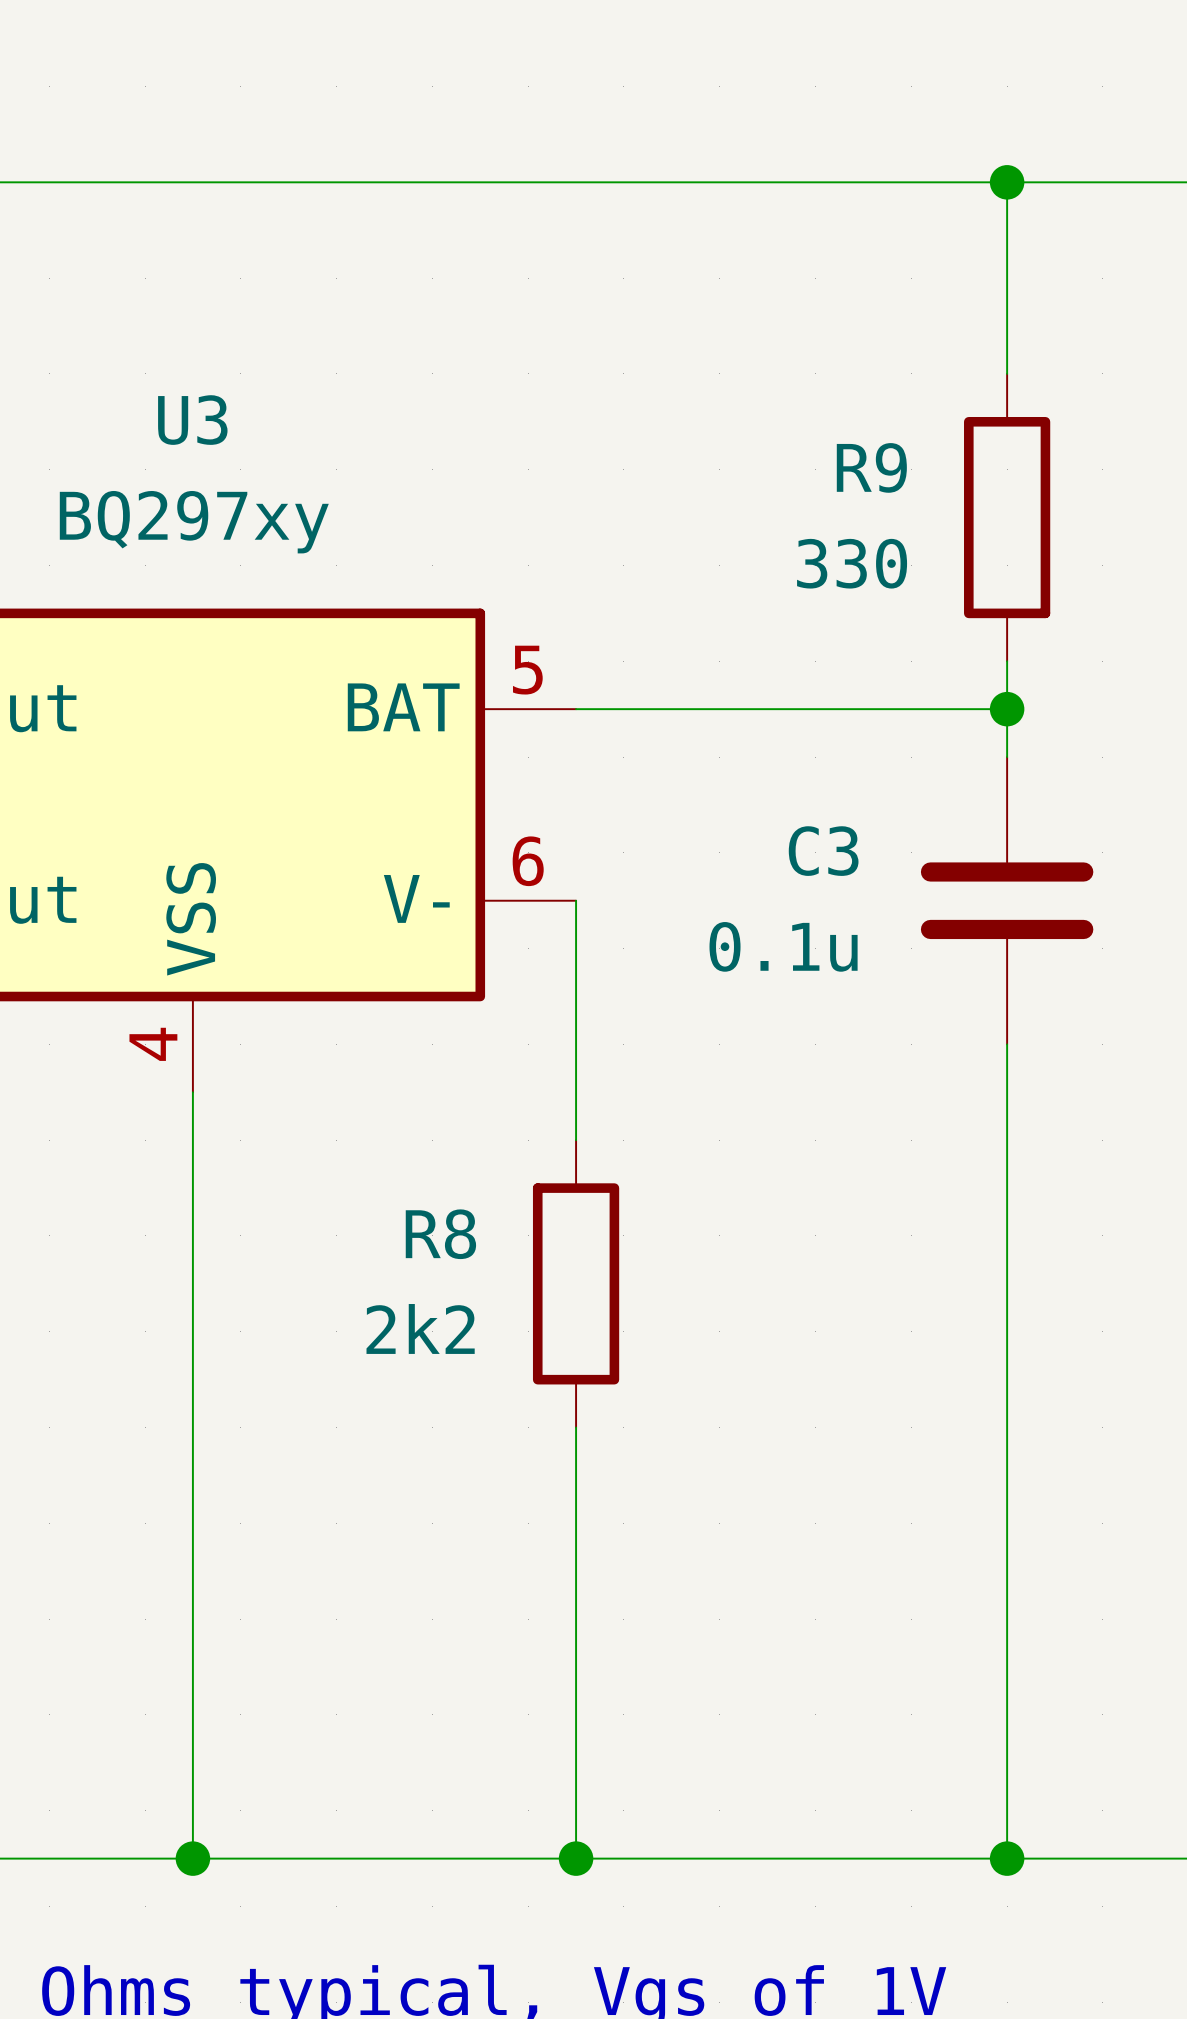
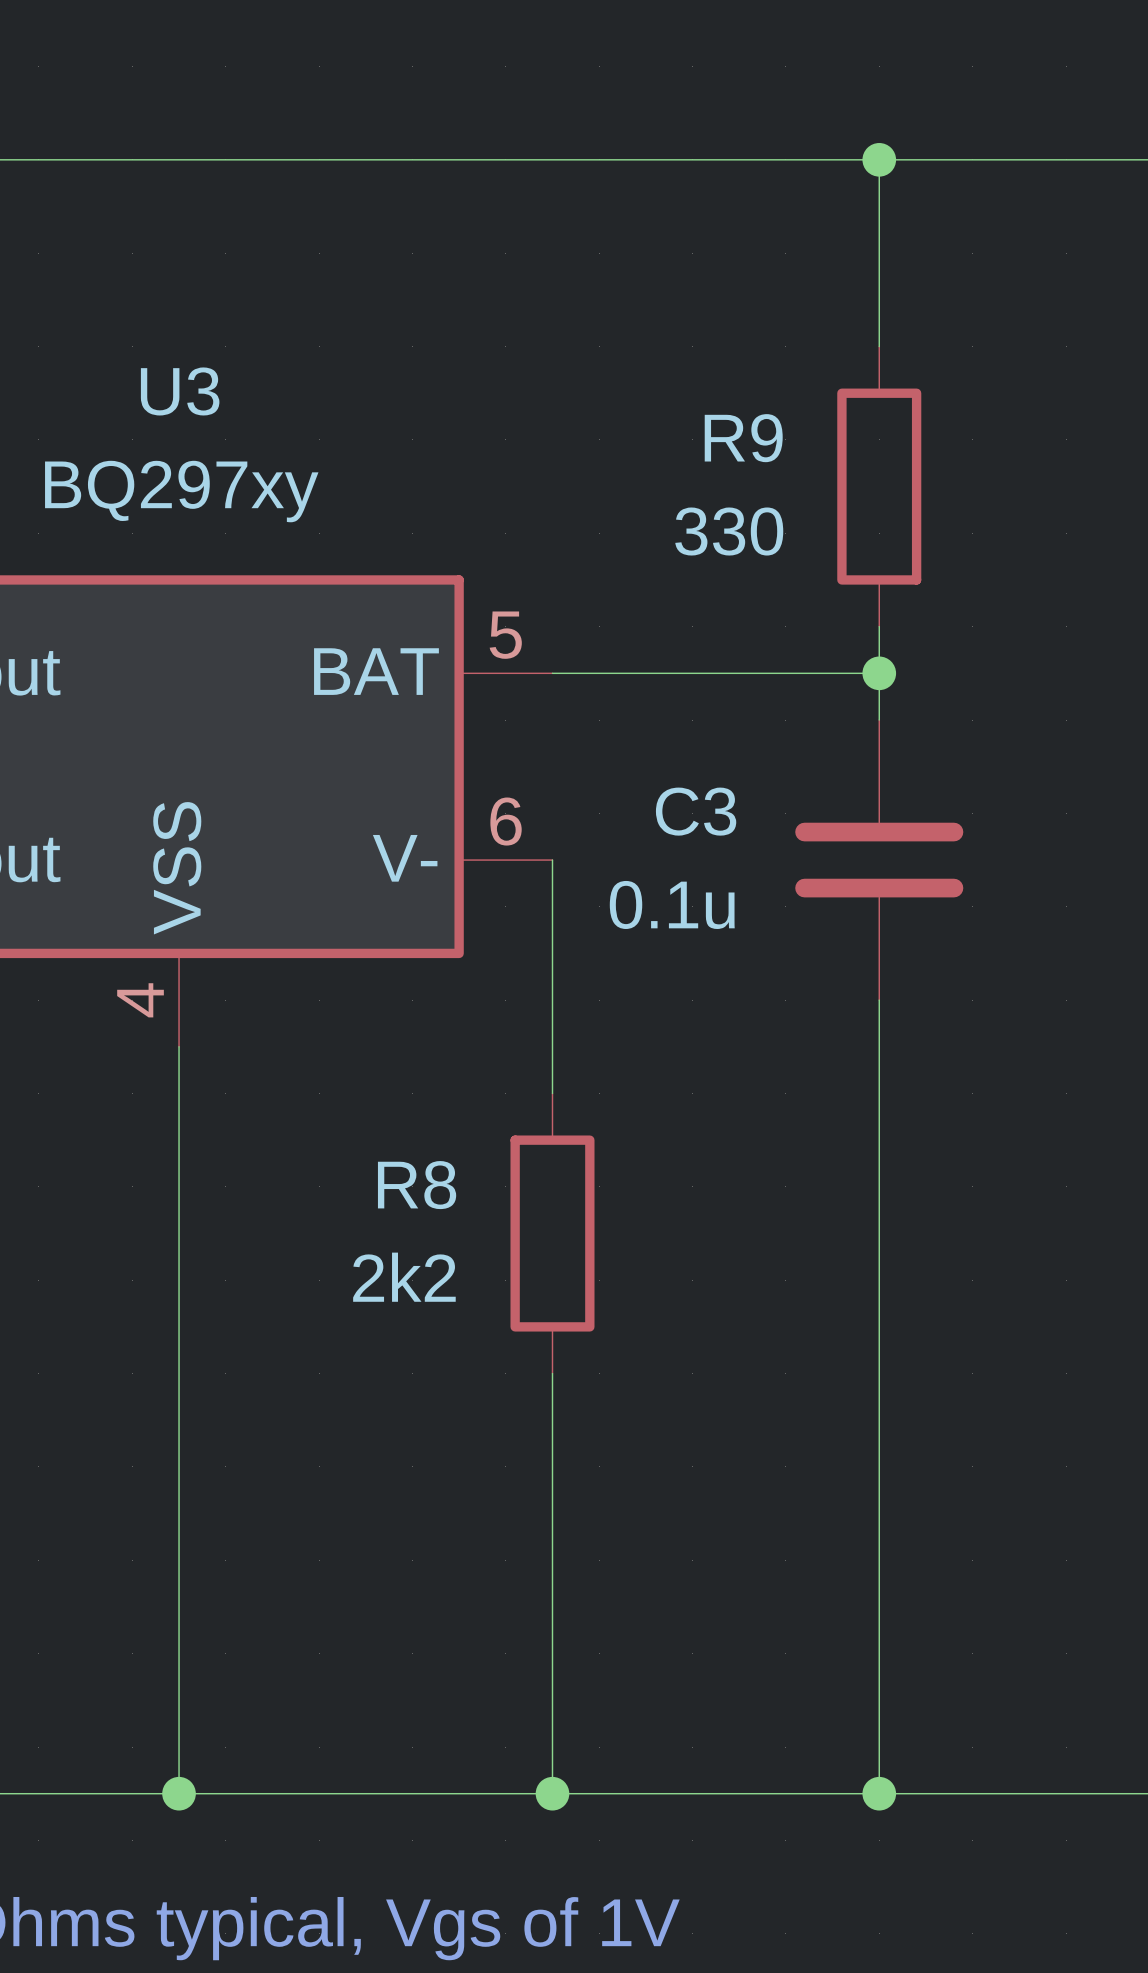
wire: (1007, 182) (1007, 373) -> (879, 159) (879, 346)
junction position: (1007, 182) -> (879, 159)
R9 position: (1007, 517) -> (879, 486)
wire: (1007, 661) (1007, 757) -> (879, 626) (879, 720)
wire: (911, 709) (1007, 709) -> none
junction position: (1007, 709) -> (879, 673)
C3 position: (1007, 900) -> (879, 860)
wire: (1007, 1044) (1007, 1858) -> (879, 1000) (879, 1793)
junction position: (1007, 1858) -> (879, 1793)

